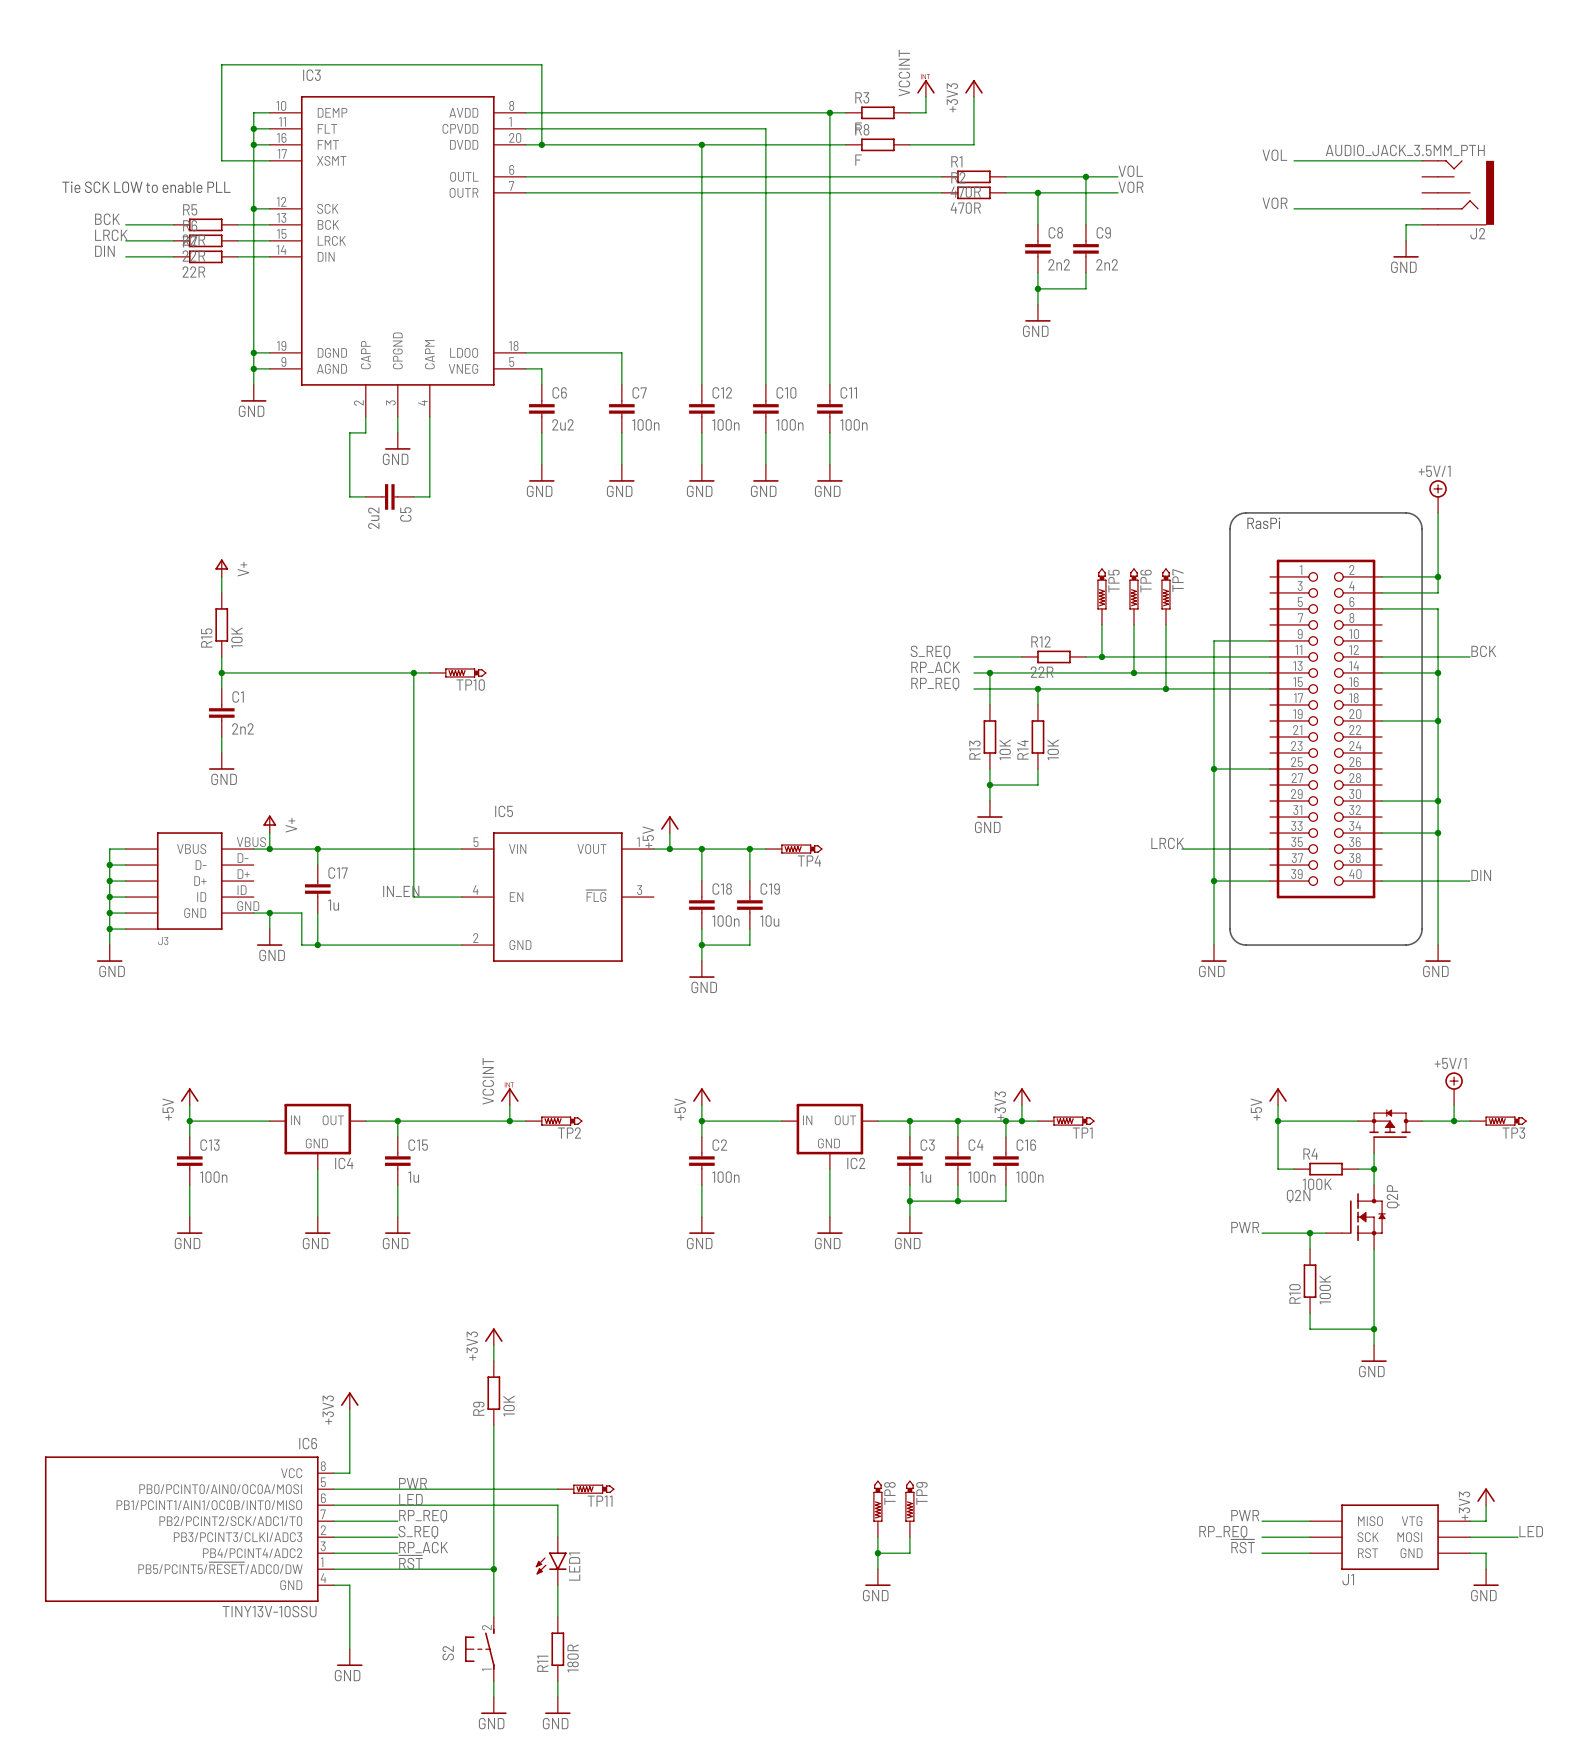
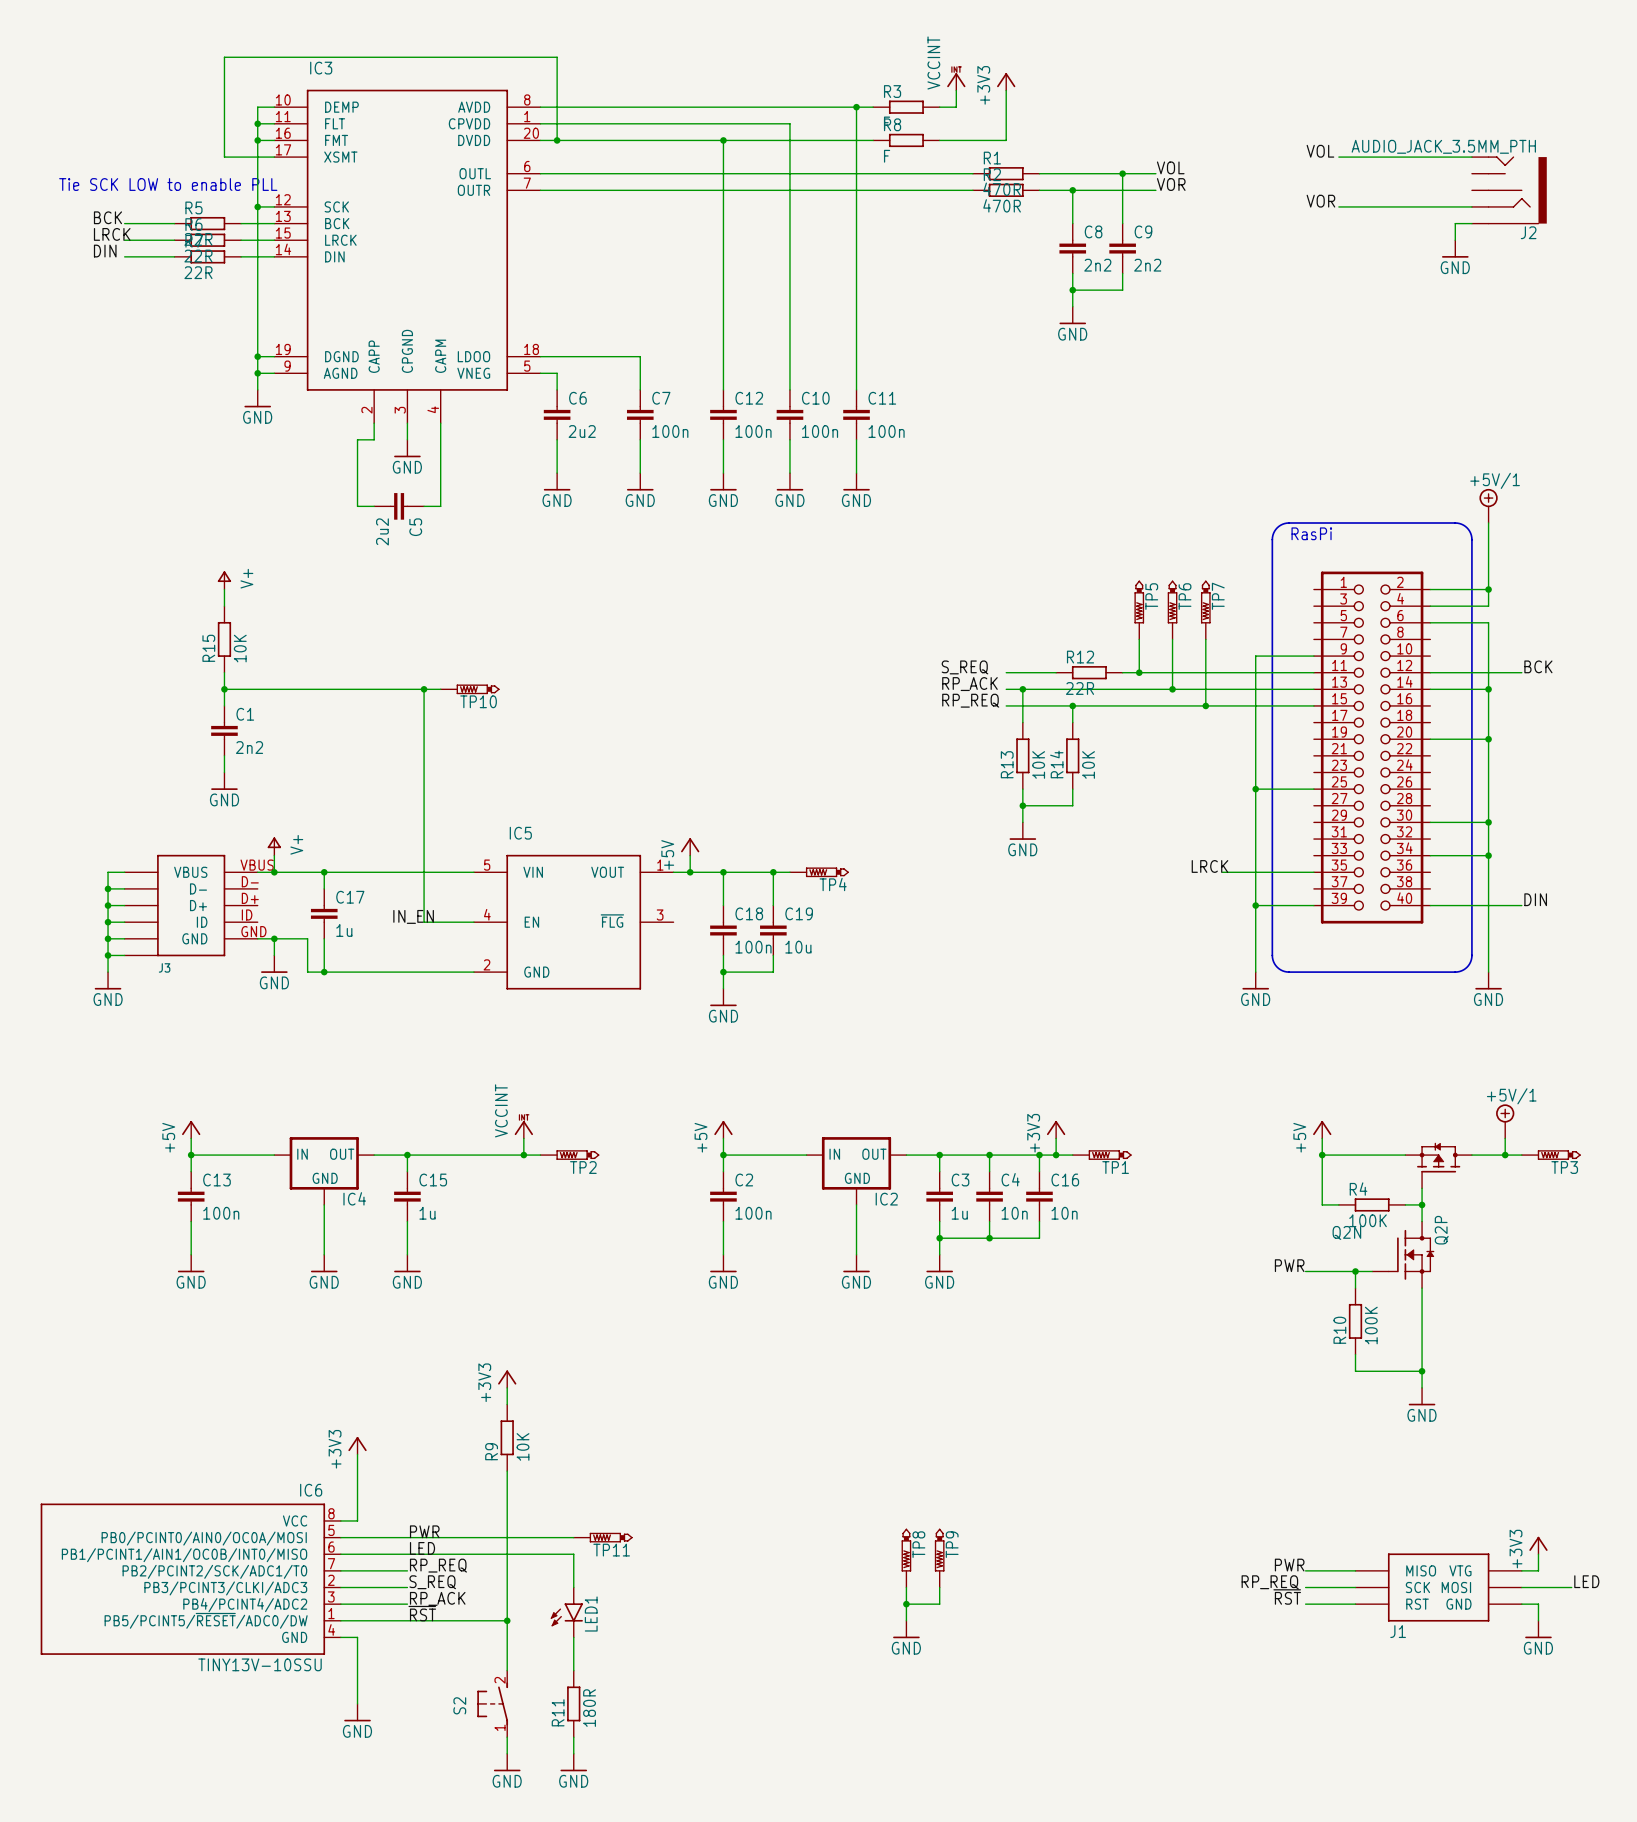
C4 value: 100n (981, 1177) -> 10n (1014, 1213)
C16 value: 100n (1029, 1177) -> 10n (1064, 1213)

